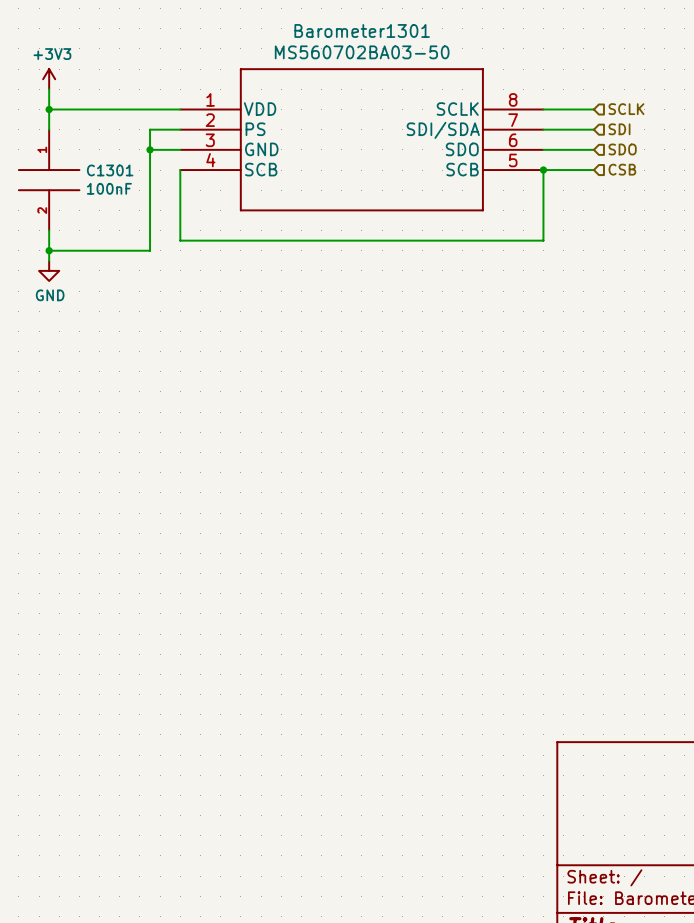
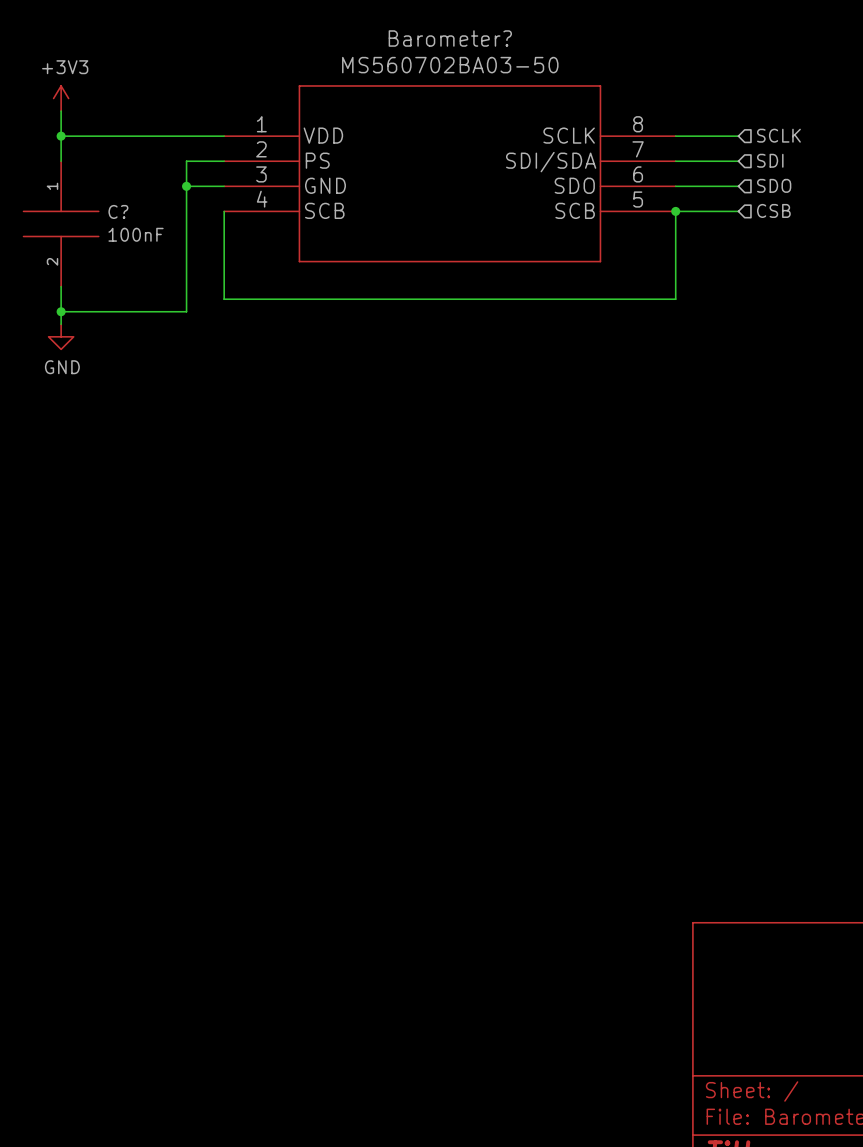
Barometer1301 name: Barometer1301 (362, 30) -> Barometer? (450, 38)
C1301 name: C1301 (110, 170) -> C? (118, 211)

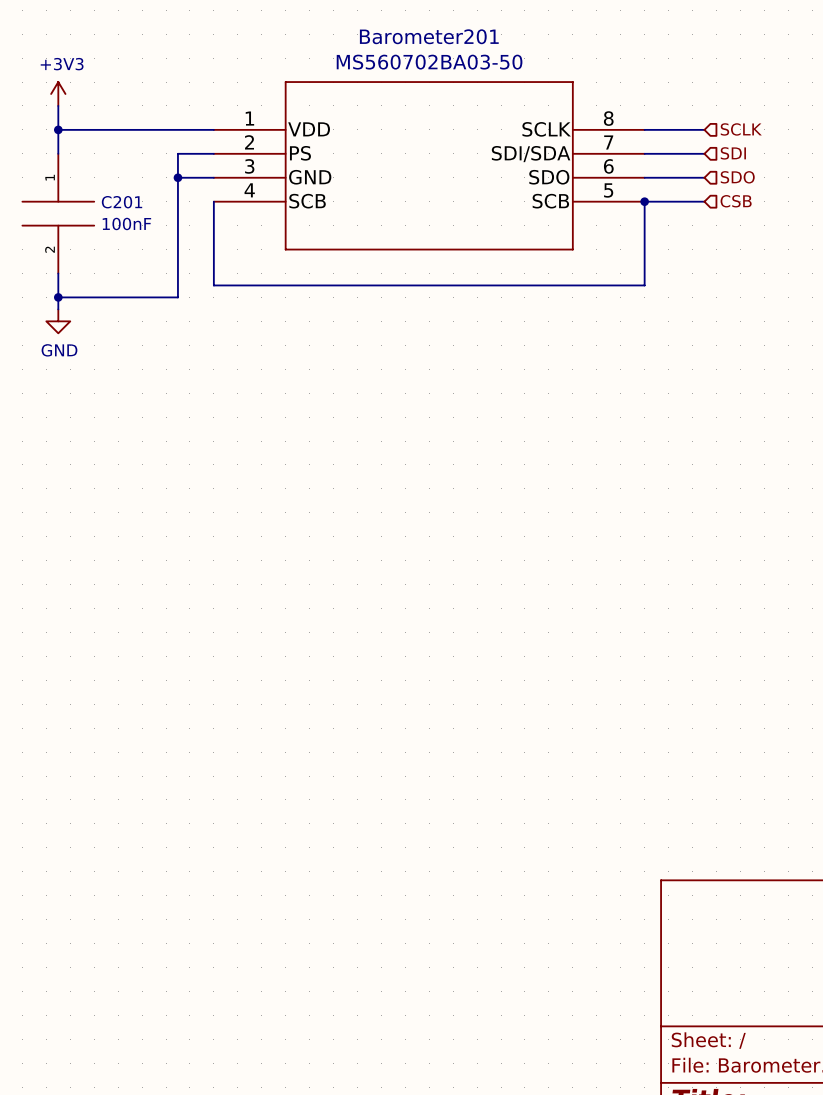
Barometer? name: Barometer? (450, 38) -> Barometer201 (429, 36)
C? name: C? (118, 211) -> C201 (122, 202)

